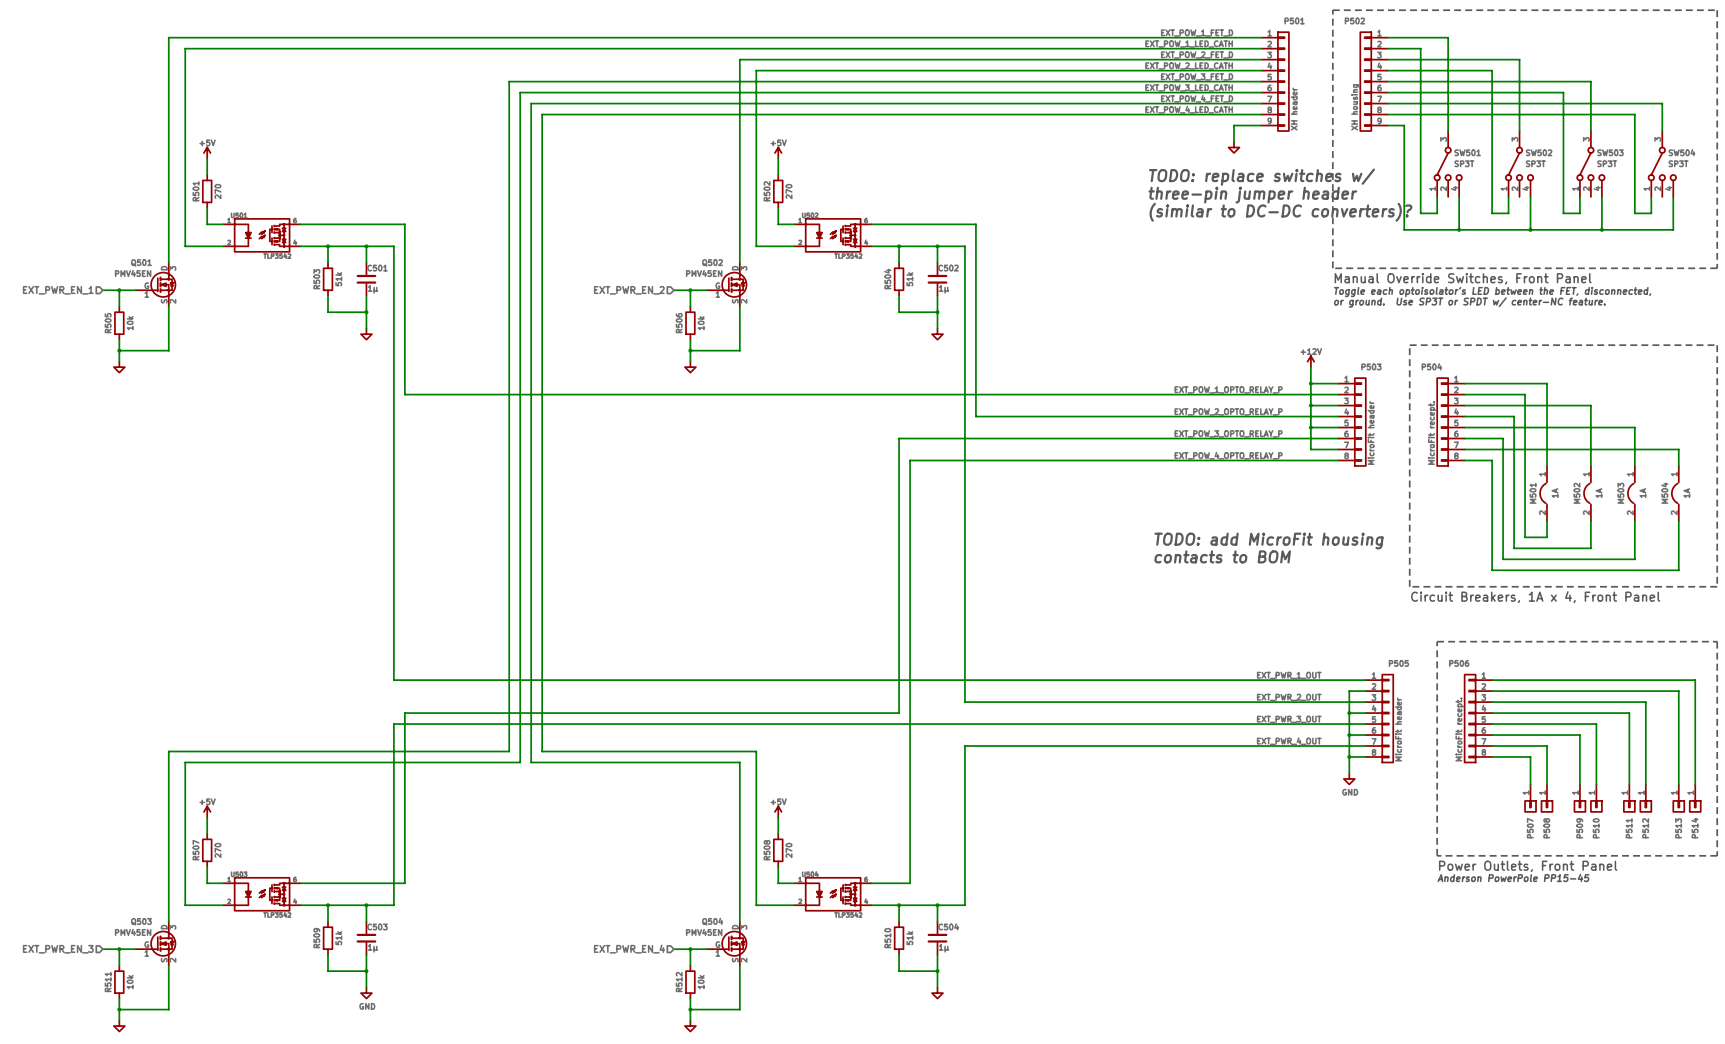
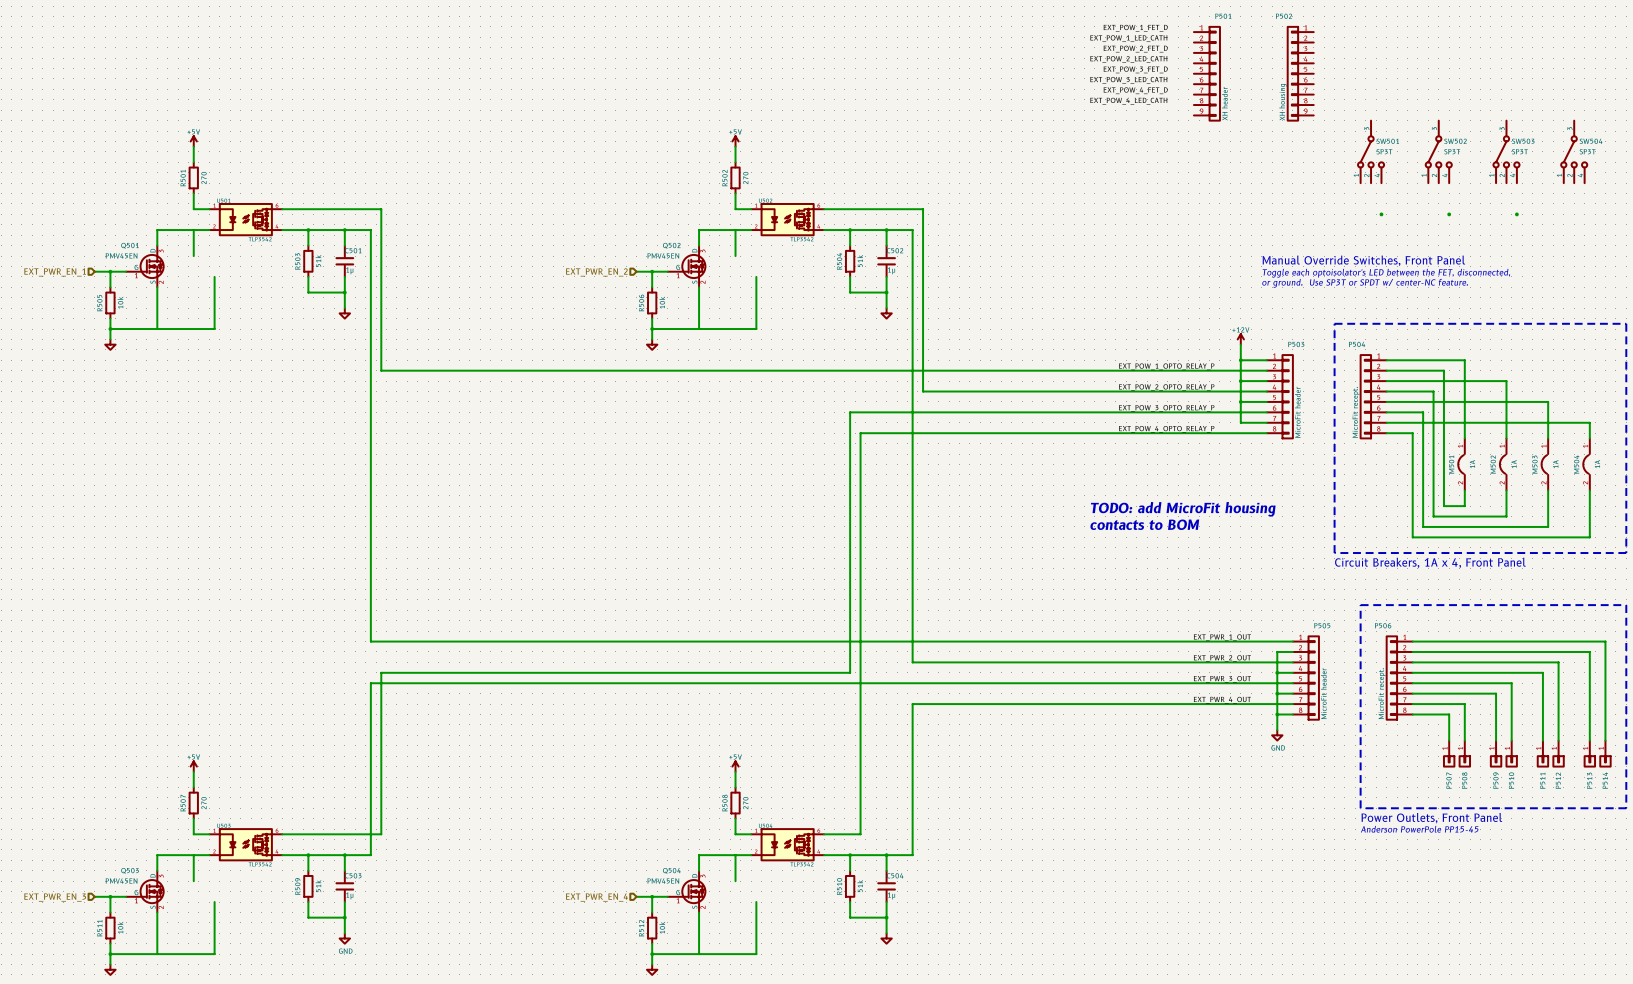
line: (1332, 10) (1717, 10) (1717, 268) (1332, 268) (1332, 10) -> none
wire: (1261, 37) (168, 37) (168, 246) -> (172, 230) (157, 230)
wire: (1387, 37) (1448, 37) (1448, 131) -> none
wire: (1261, 48) (185, 48) (185, 246) -> none
wire: (1387, 48) (1420, 48) (1420, 213) (1437, 213) (1437, 196) -> none
wire: (1261, 59) (739, 59) (739, 246) -> (714, 230) (699, 230)
wire: (1387, 59) (1519, 59) (1519, 131) -> none
wire: (1261, 70) (756, 70) (756, 246) -> none
wire: (1387, 70) (1492, 70) (1492, 213) (1508, 213) (1508, 196) -> none
wire: (1261, 81) (509, 81) (509, 751) (168, 751) (168, 905) -> (172, 855) (157, 855)
wire: (1387, 81) (1590, 81) (1590, 131) -> none
wire: (1261, 92) (520, 92) (520, 762) (185, 762) (185, 905) -> none
wire: (1387, 92) (1563, 92) (1563, 213) (1579, 213) (1579, 196) -> none
wire: (1261, 103) (531, 103) (531, 762) (739, 762) (739, 905) -> none
wire: (1387, 103) (1662, 103) (1662, 131) -> none
wire: (1261, 114) (542, 114) (542, 751) (756, 751) (756, 905) -> (699, 855) (714, 855)
wire: (1387, 114) (1634, 114) (1634, 213) (1651, 213) (1651, 196) -> none
wire: (1261, 125) (1234, 125) (1234, 142) -> none
wire: (1387, 125) (1404, 125) (1404, 229) (1673, 229) (1673, 196) -> none
power symbol: (1234, 147) -> none
text: TODO: replace switches w/ (1261, 177) -> none
text: three-pin jumper header (1252, 195) -> none
wire: (1459, 196) (1459, 229) -> none
wire: (1530, 196) (1530, 229) -> none
wire: (1601, 196) (1601, 229) -> none
text: (similar to DC-DC converters)? (1280, 212) -> none
wire: none -> (193, 230) (193, 256)
wire: none -> (735, 230) (735, 256)
wire: none -> (214, 276) (214, 329) (157, 329)
wire: none -> (756, 276) (756, 329) (699, 329)
wire: none -> (193, 855) (193, 881)
wire: none -> (735, 855) (735, 881)
wire: none -> (214, 902) (214, 954) (157, 954)
wire: none -> (756, 902) (756, 954) (699, 954)

